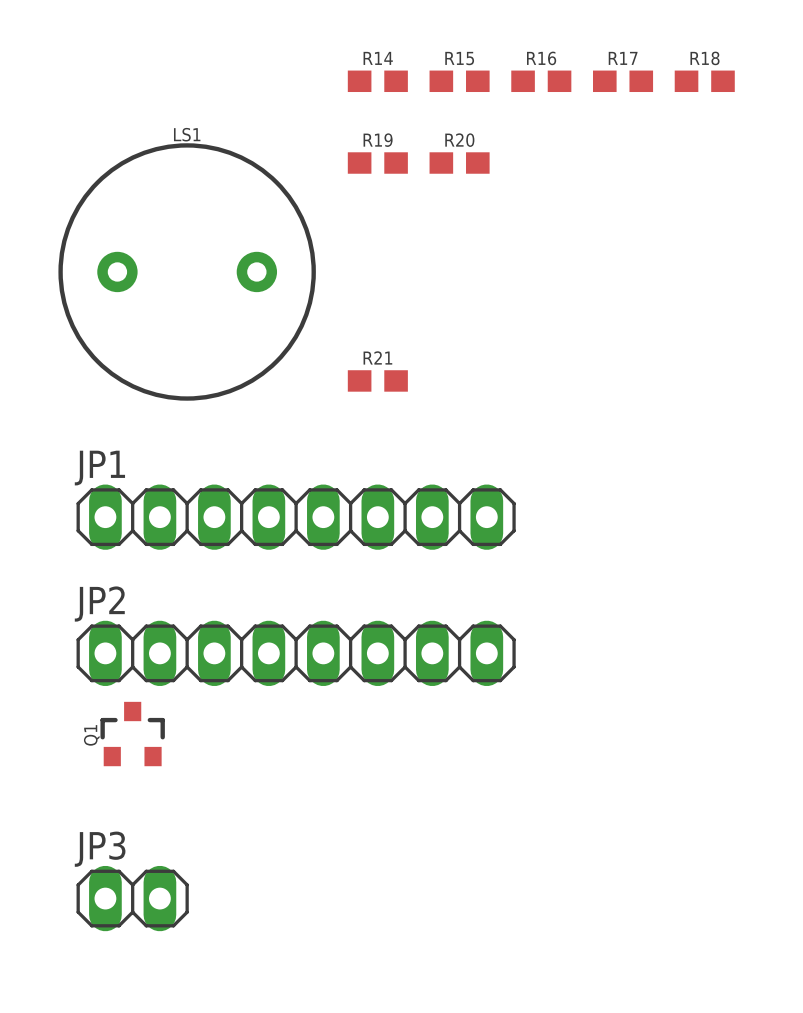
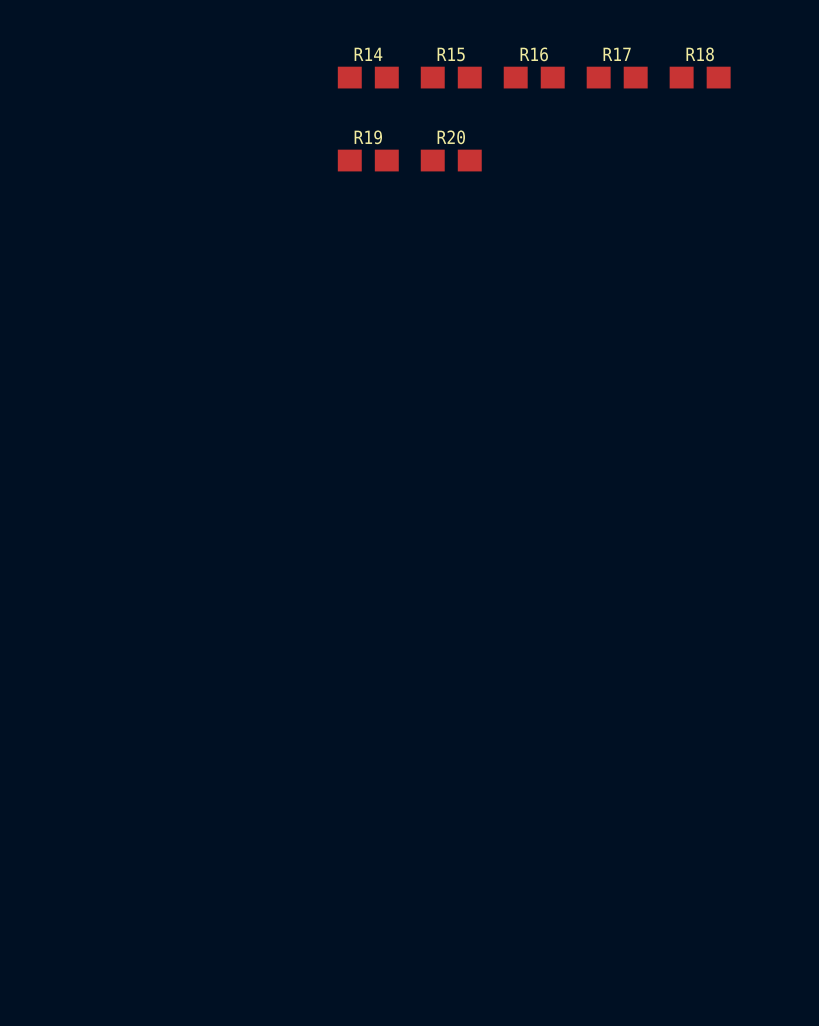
LS1: (187, 271) -> none
R21: (377, 380) -> none
JP1: (296, 517) -> none
JP2: (296, 653) -> none
Q1: (132, 734) -> none
JP3: (132, 898) -> none

